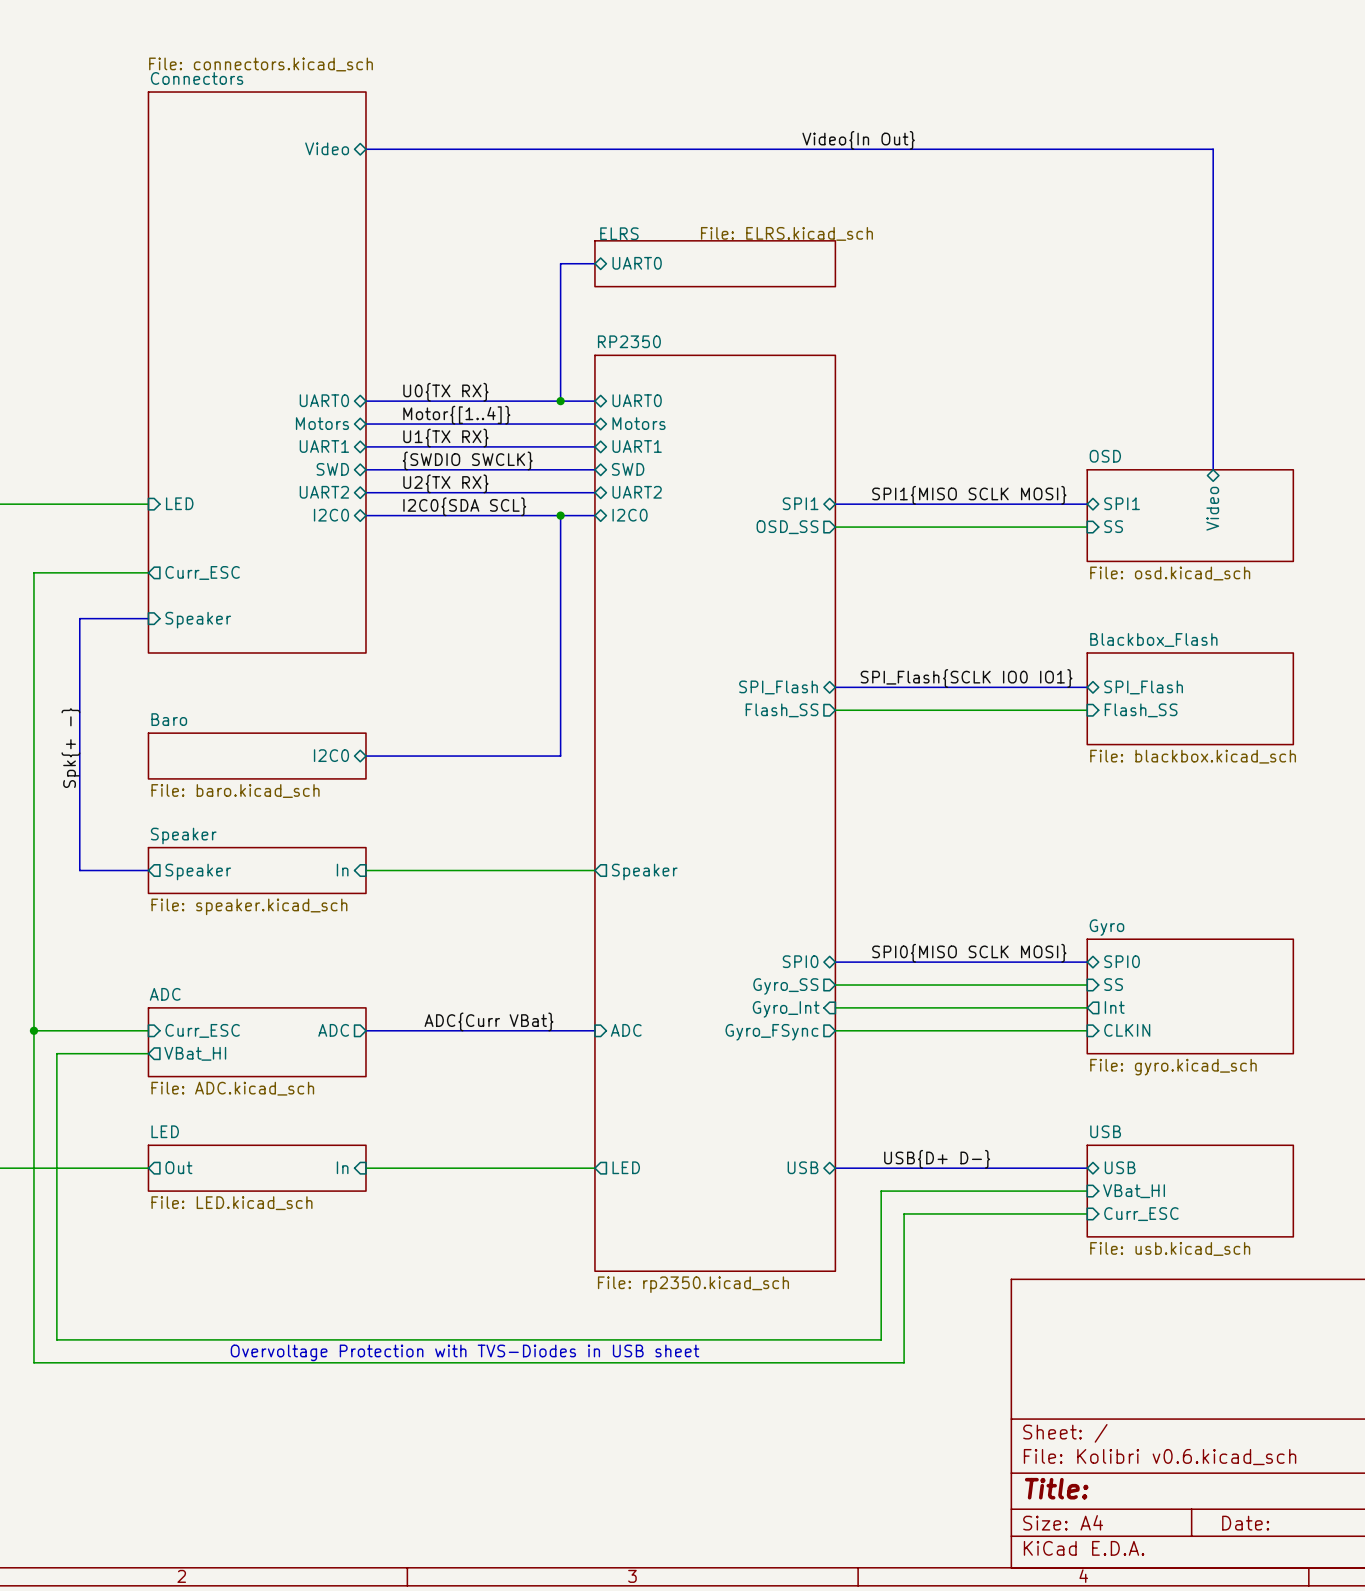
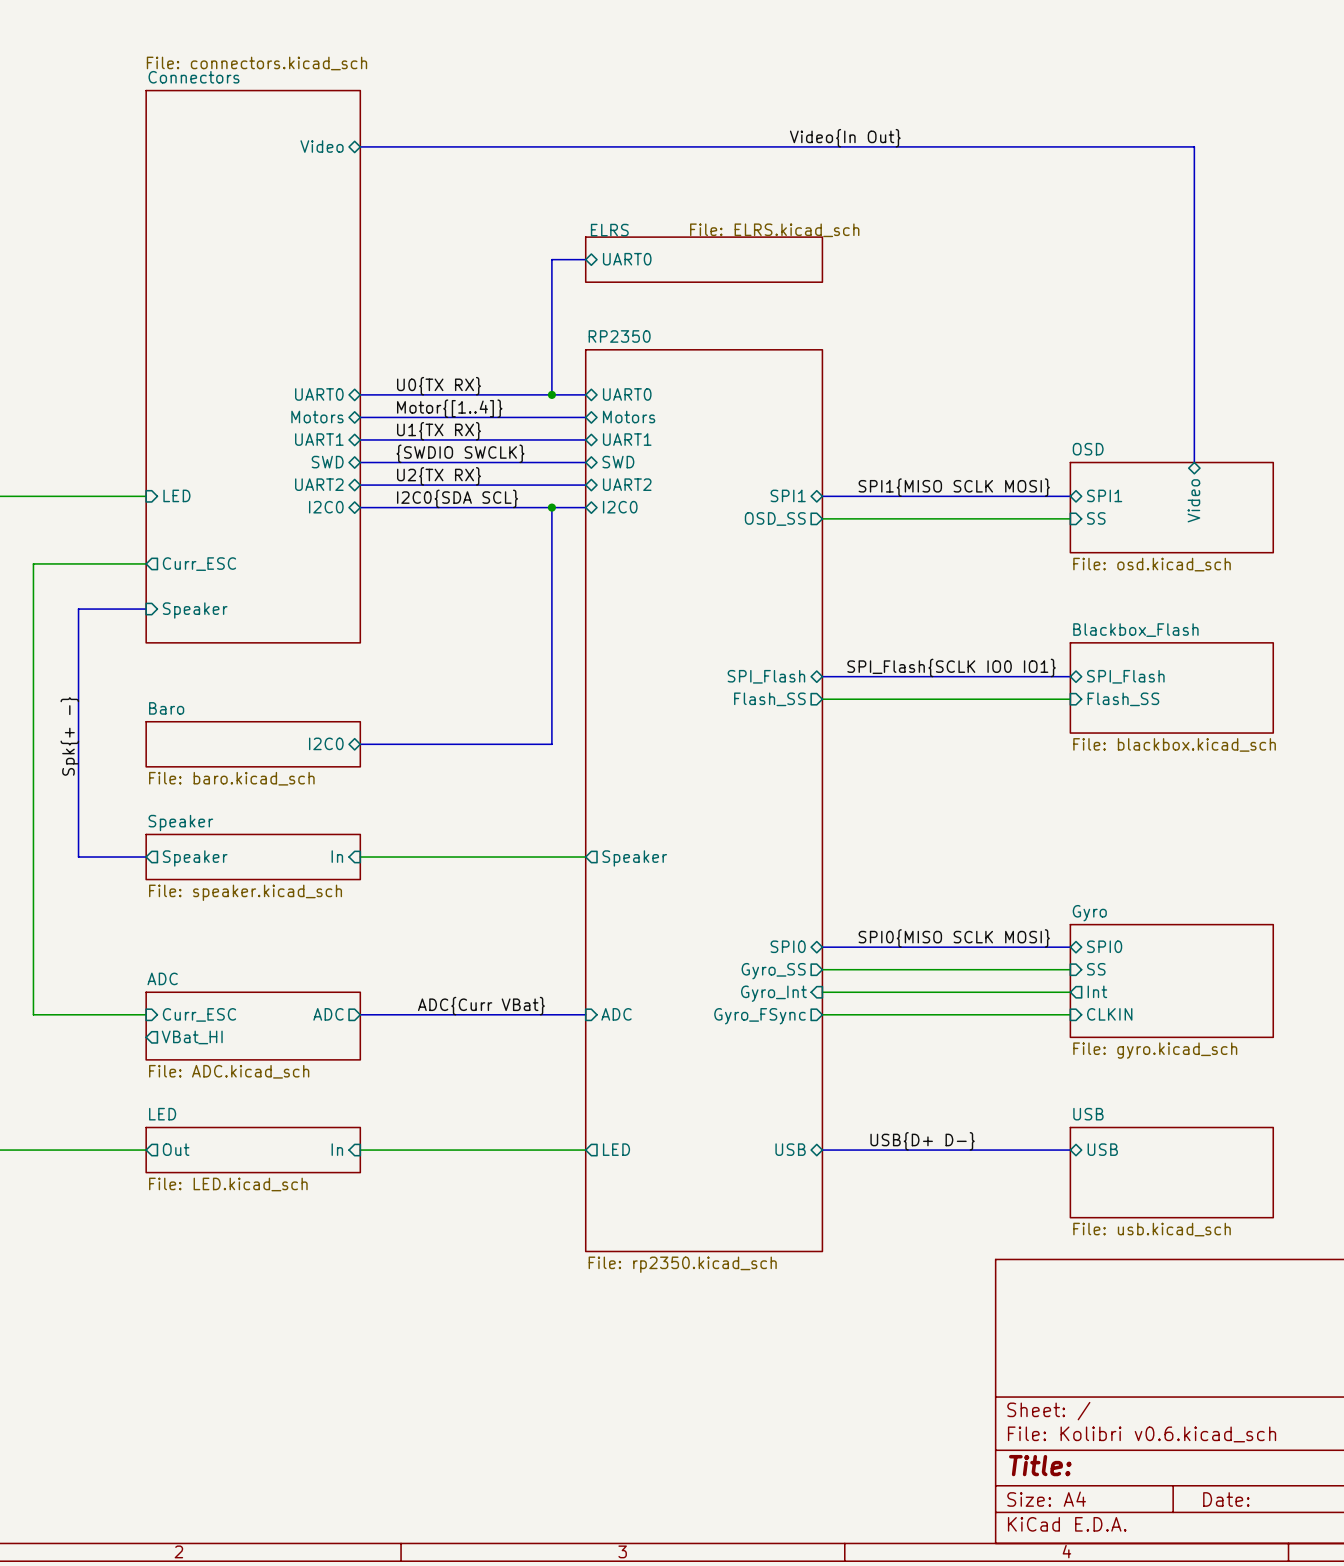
wire: (33, 1030) (33, 1362) (904, 1362) (904, 1213) (1087, 1213) -> none
junction: (33, 1030) -> none
wire: (148, 1053) (56, 1053) (56, 1339) (881, 1339) (881, 1191) (1087, 1191) -> none
sheet pin: VBat_HI (1134, 1191) -> none
sheet pin: Curr_ESC (1141, 1214) -> none
text: Overvoltage Protection with TVS-Diodes in USB sheet (464, 1352) -> none

